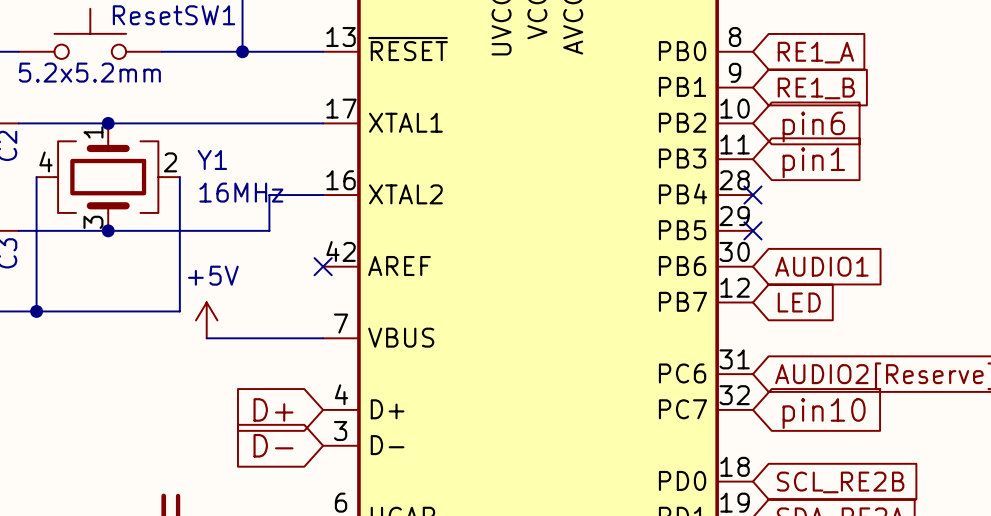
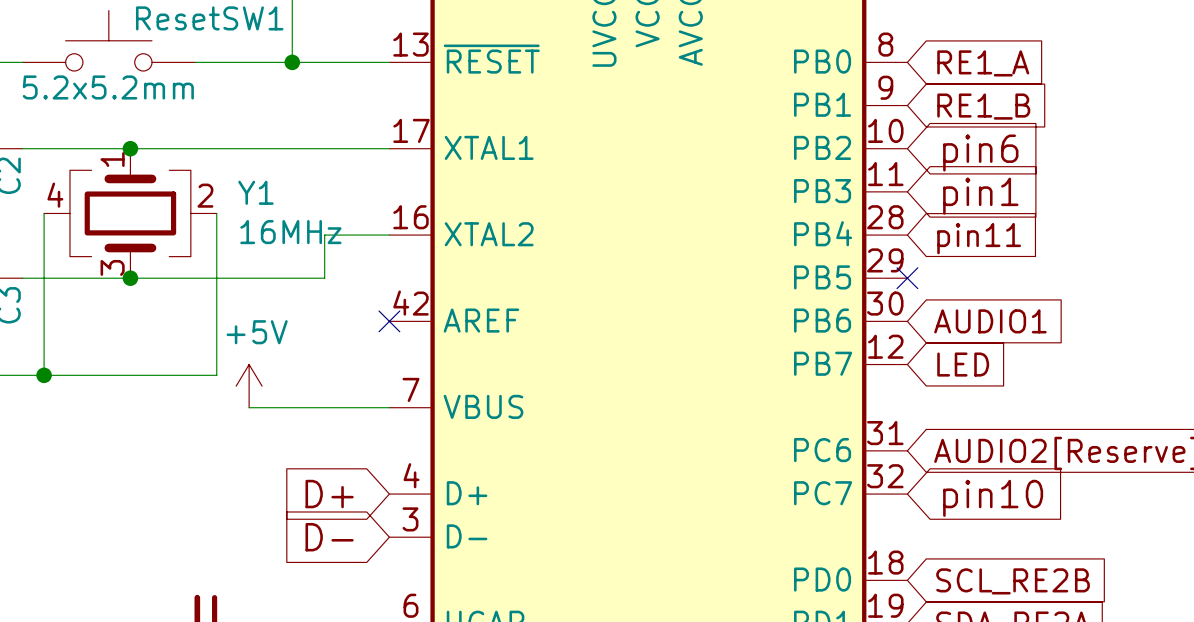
no-connect mark: (752, 195) -> none
global label: none -> pin11 (979, 238)

